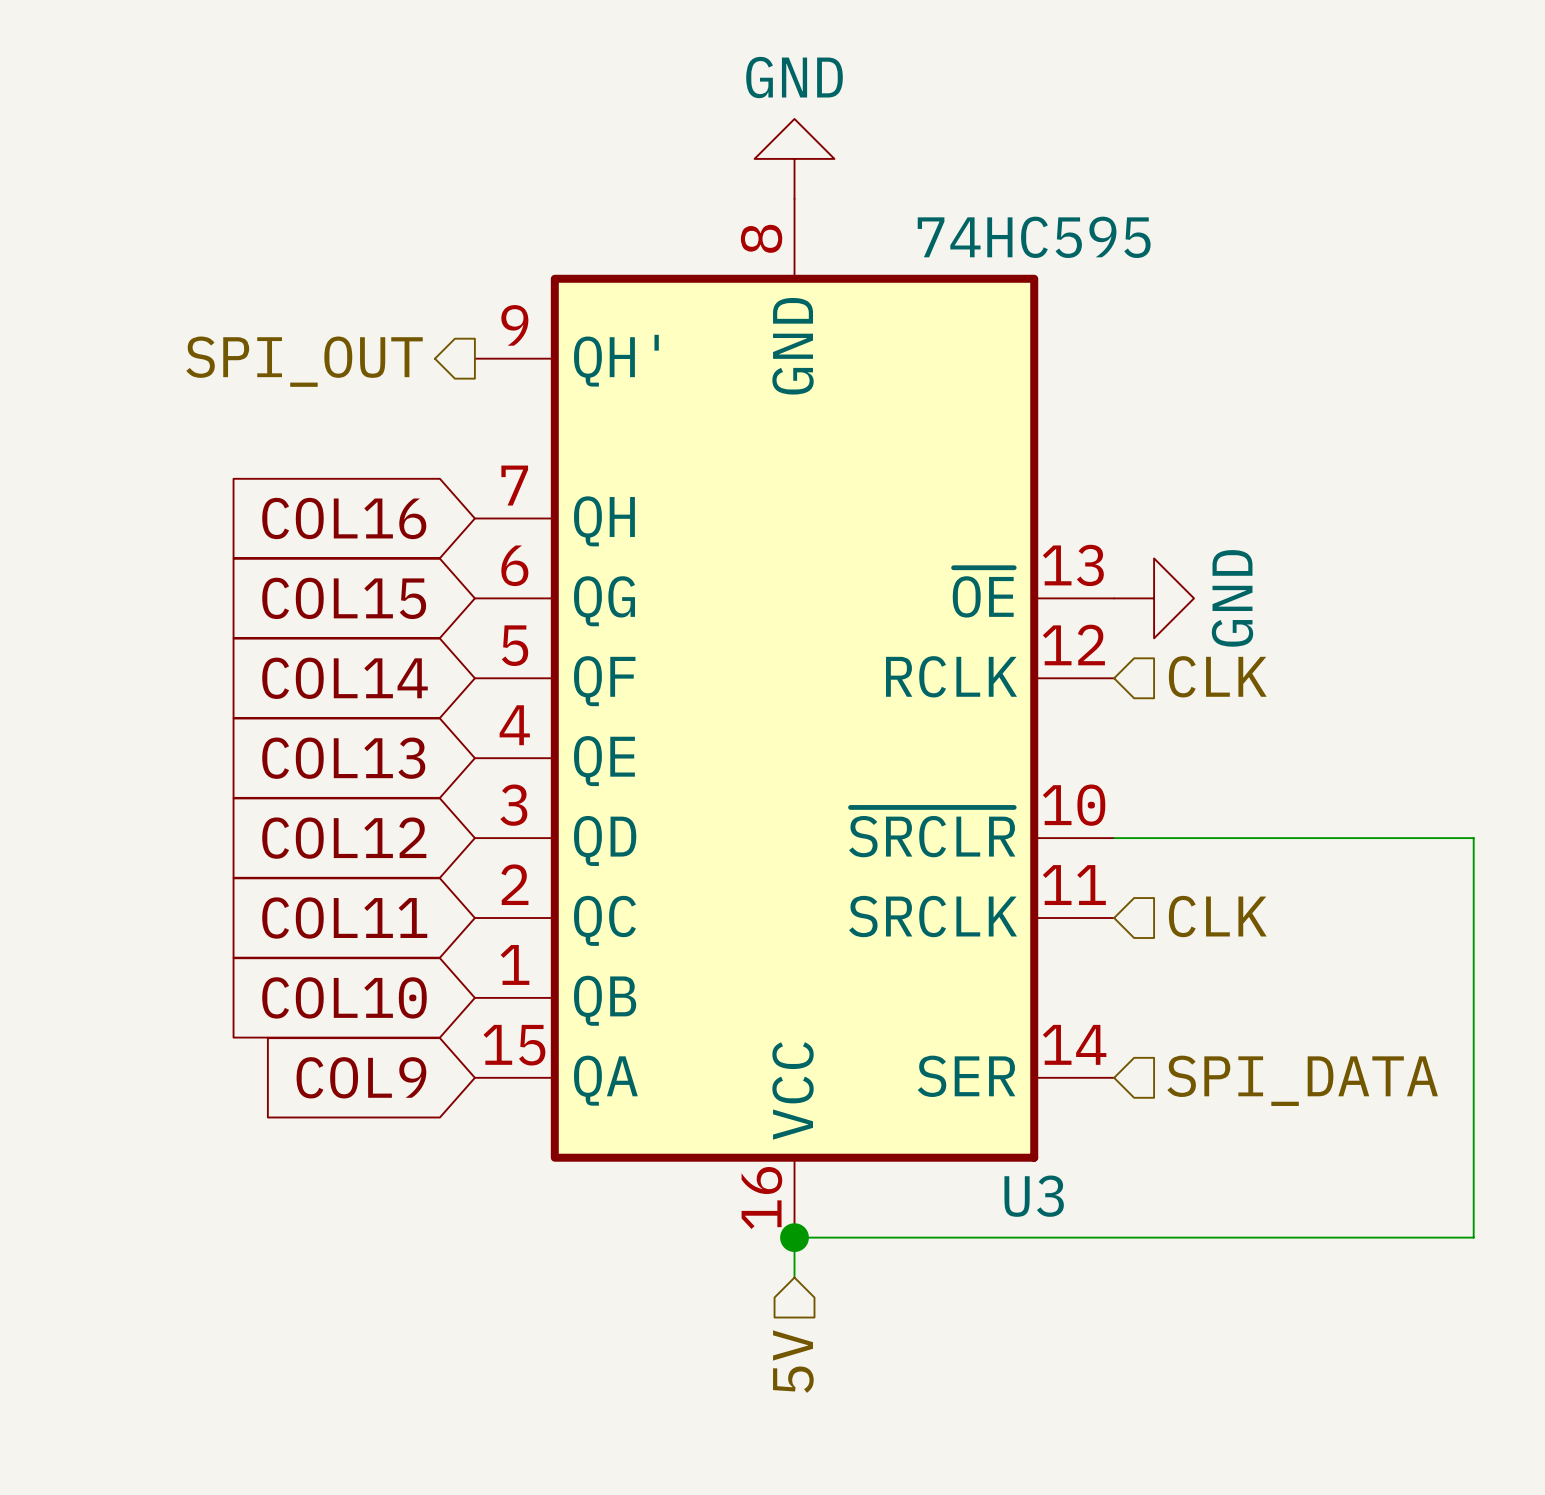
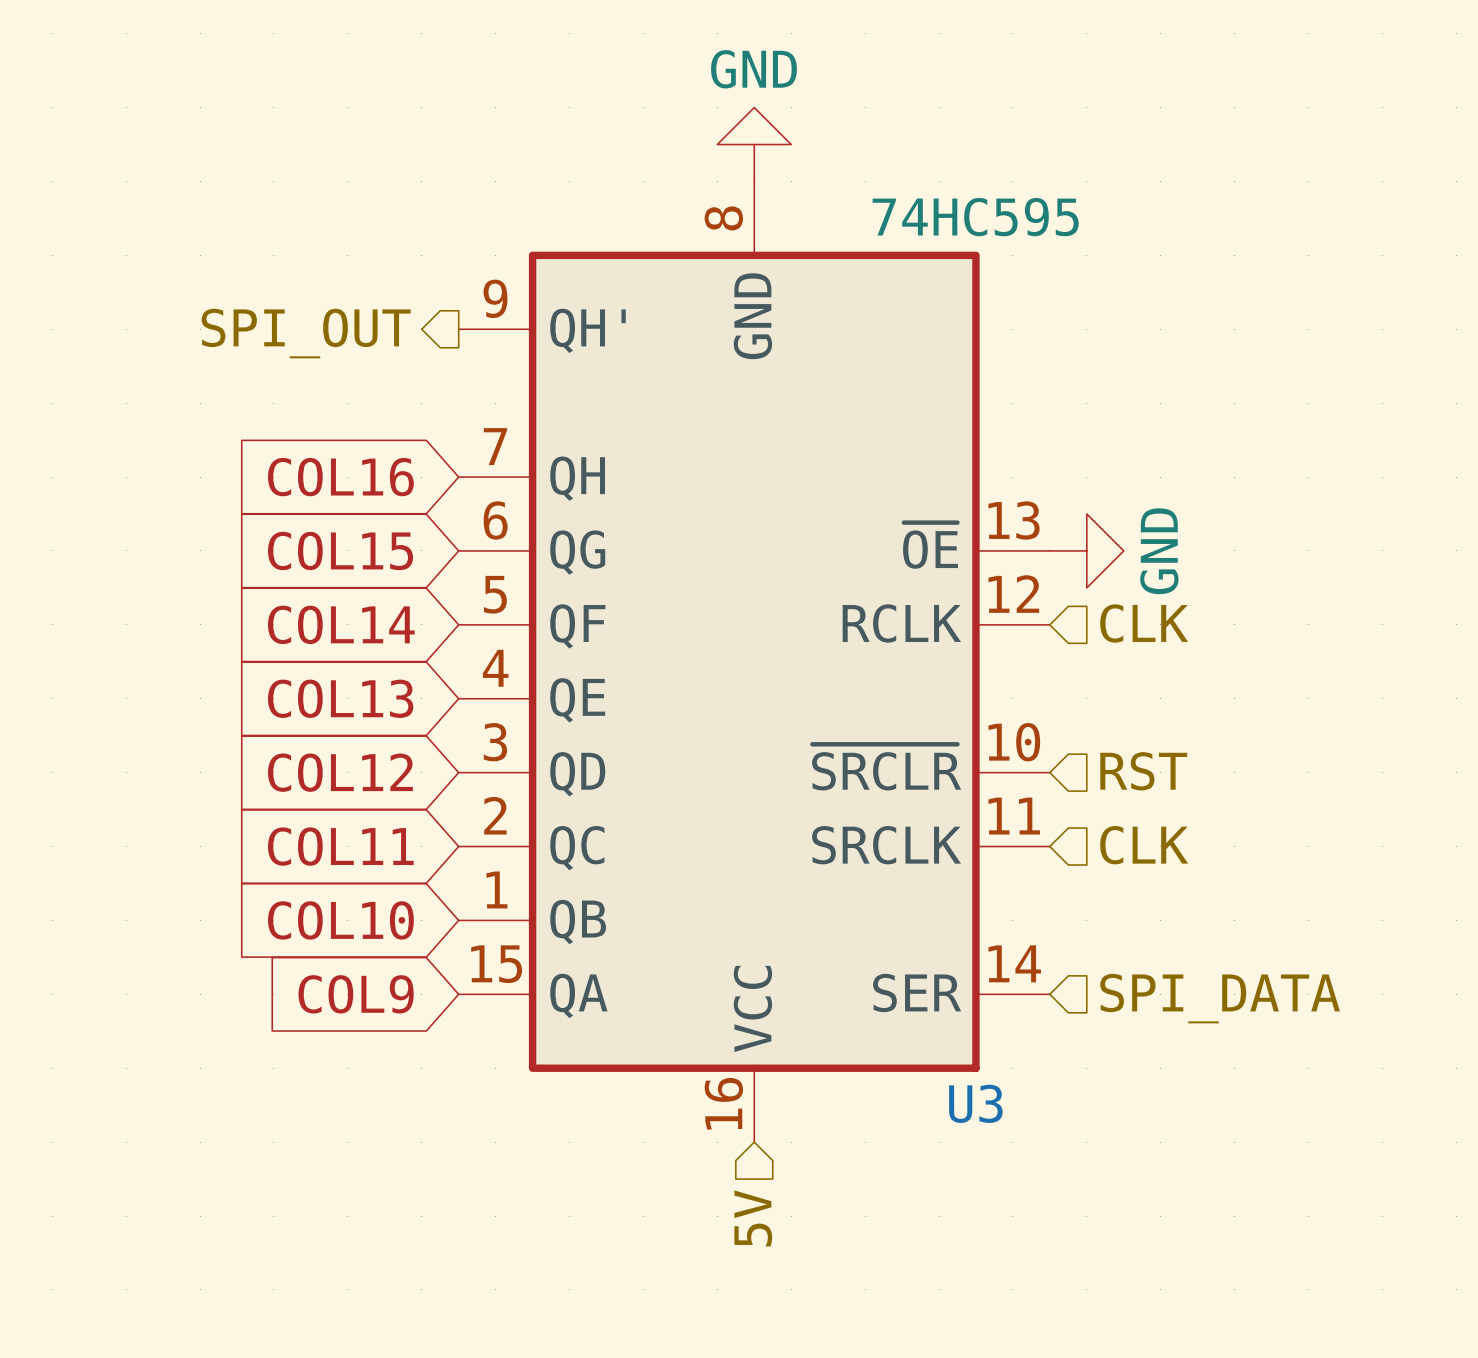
hierarchical label: none -> RST (1143, 771)
wire: (1114, 838) (1473, 838) (1473, 1237) (794, 1237) (794, 1277) -> none
junction: (794, 1237) -> none
hierarchical label position: 5V (793, 1361) -> 5V (753, 1218)

